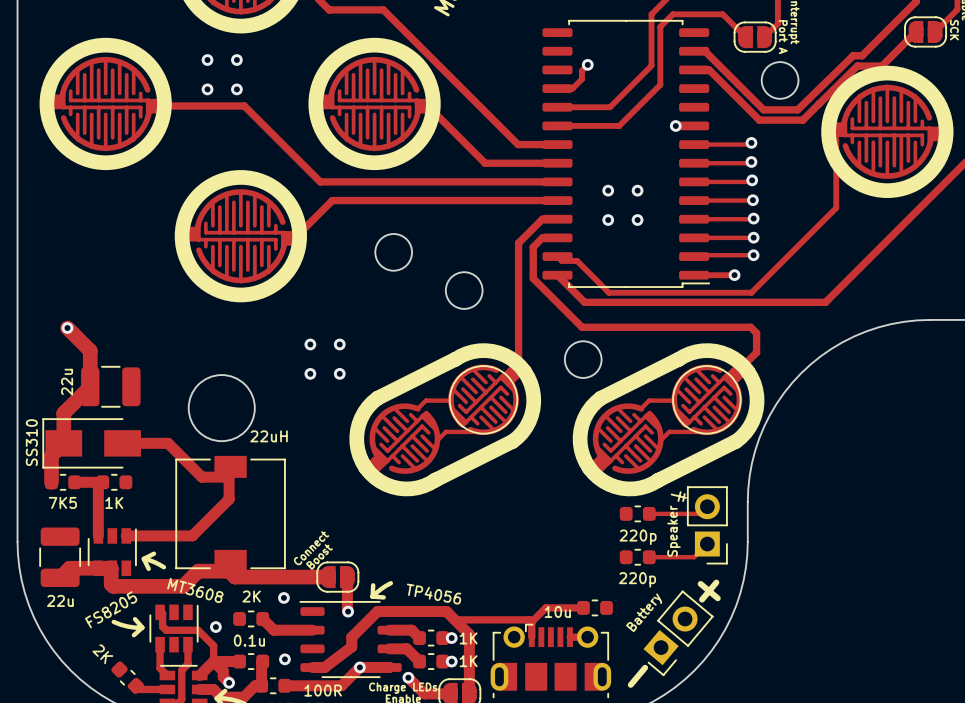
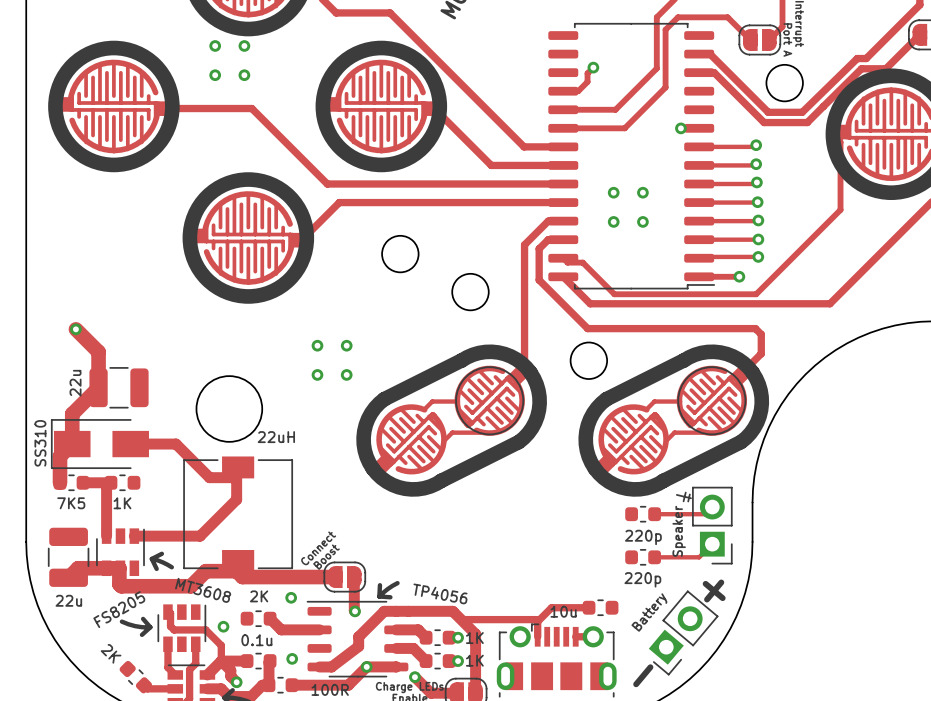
via: none -> (215, 45)
via: none -> (244, 45)
via: (207, 60) -> none
via: (236, 60) -> none
via: none -> (215, 75)
via: none -> (244, 75)
via: (207, 89) -> none
via: (236, 89) -> none

